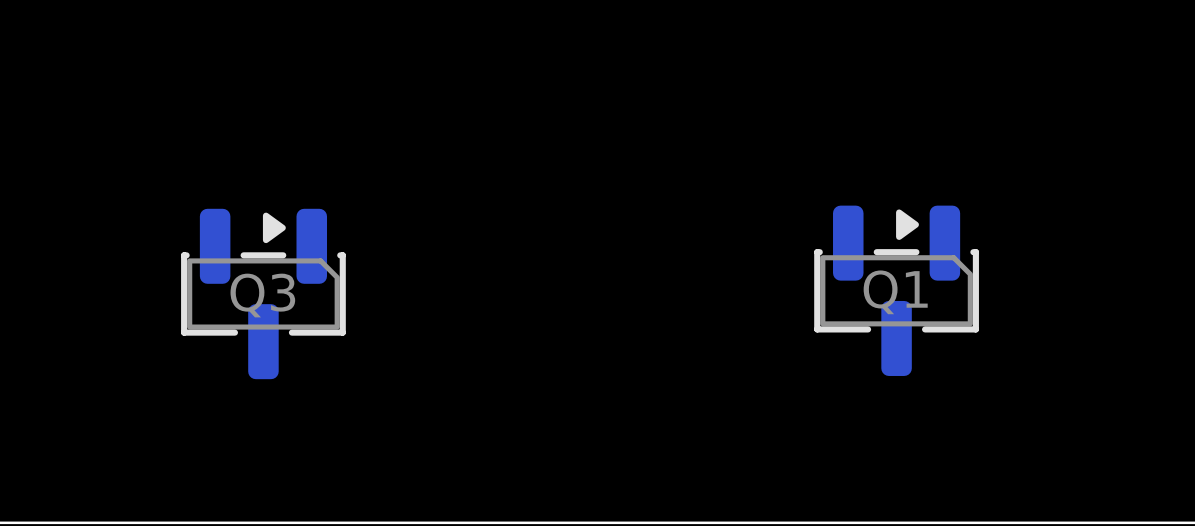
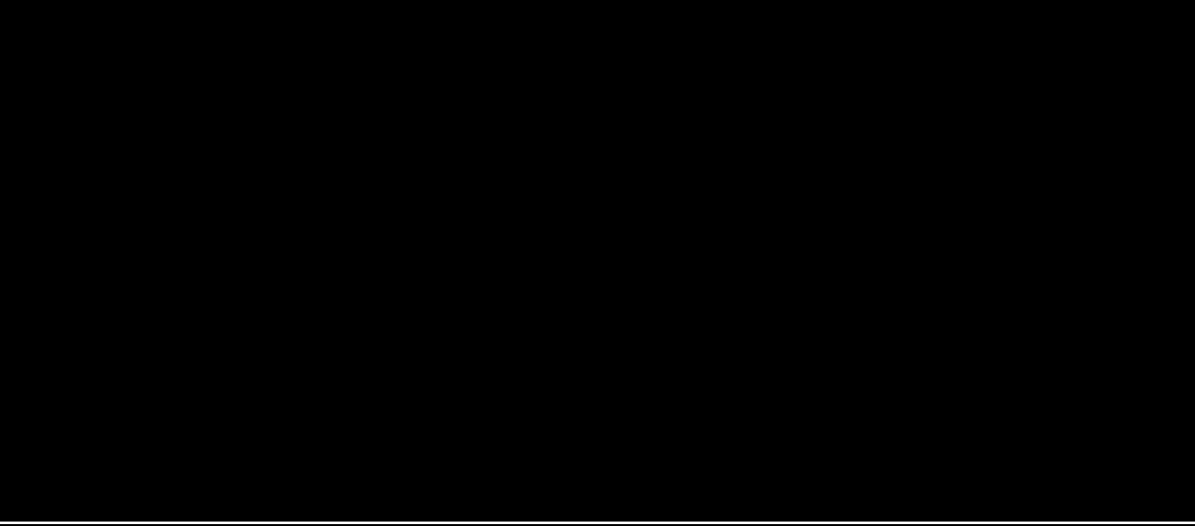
Q1: (896, 290) -> none
Q3: (263, 293) -> none

